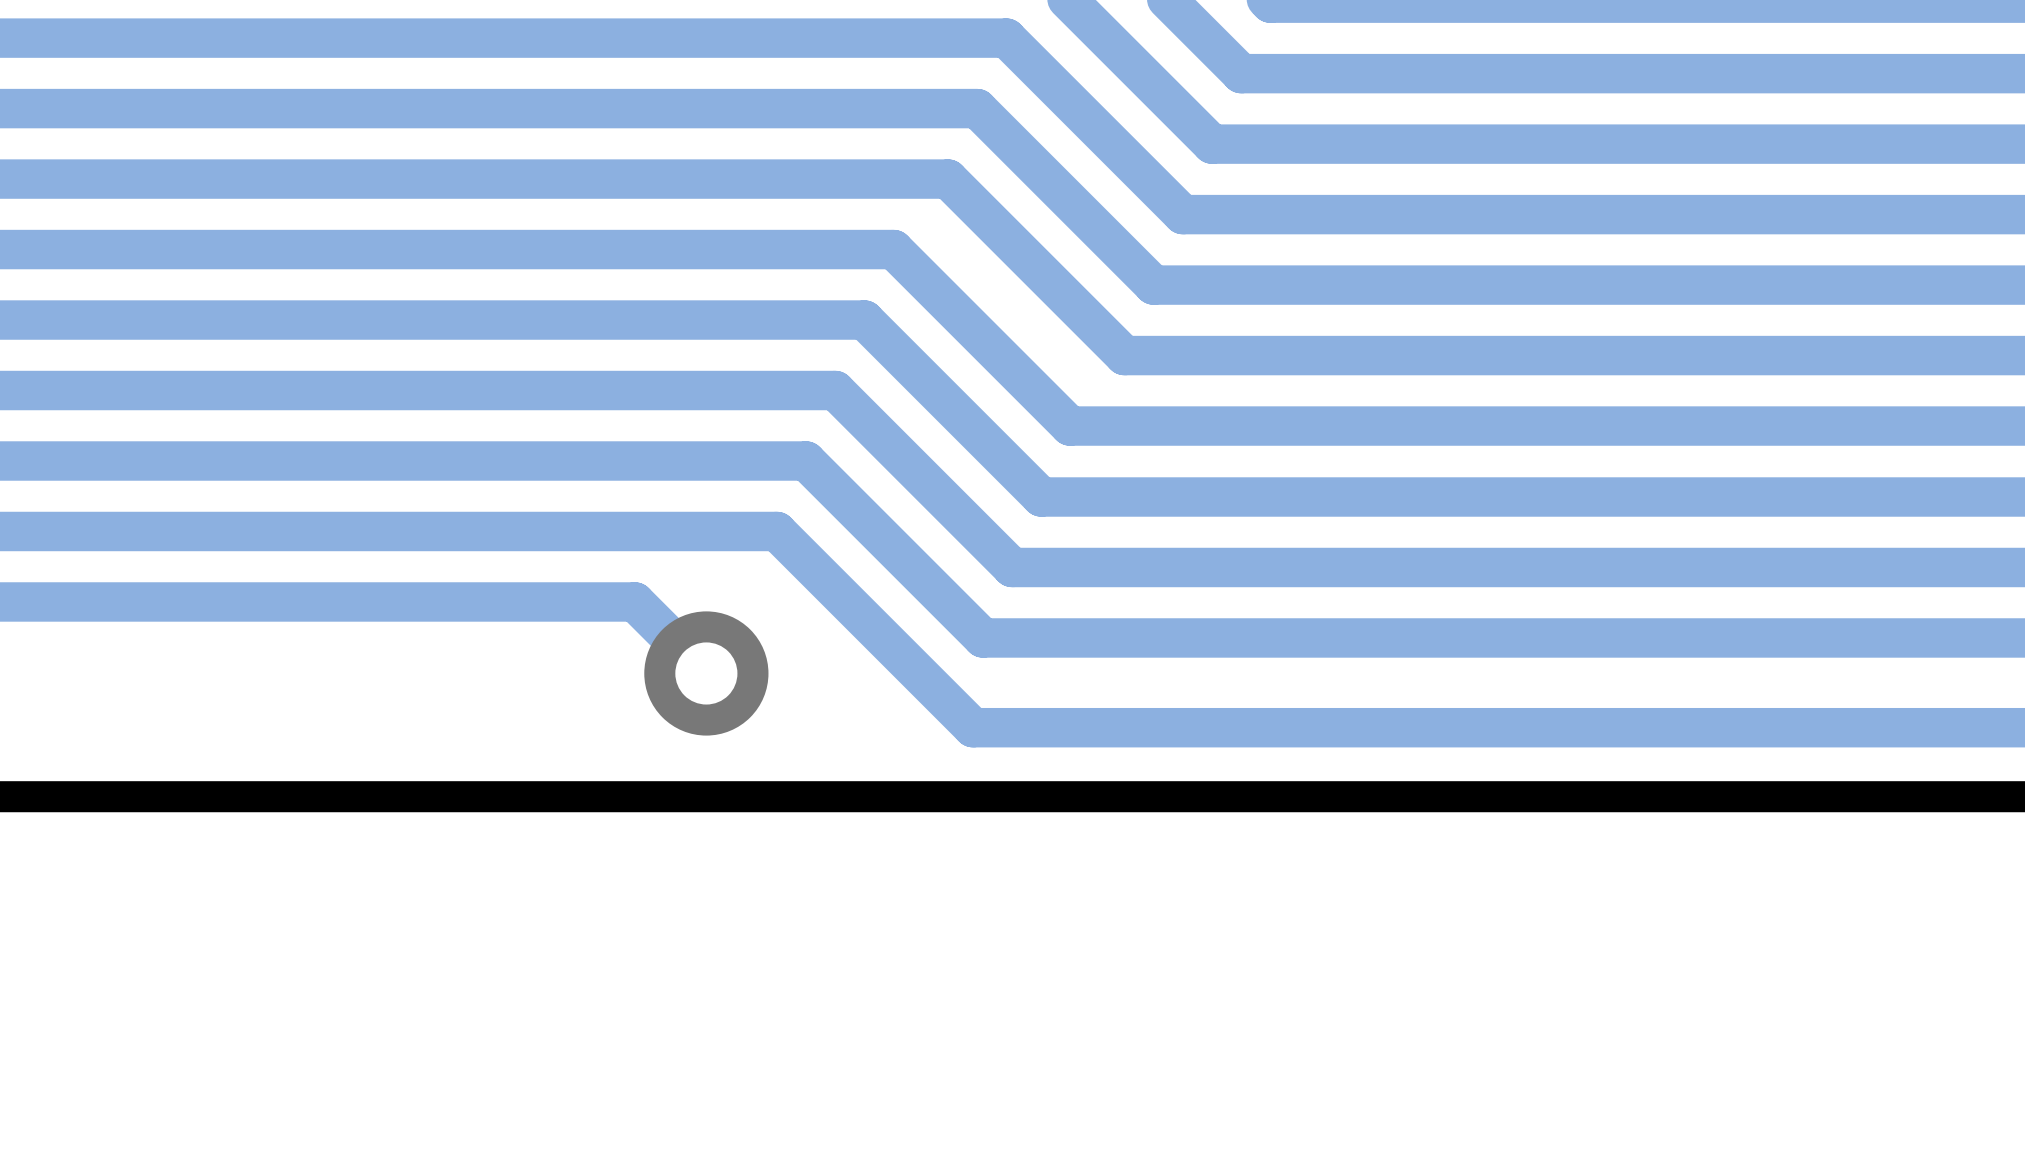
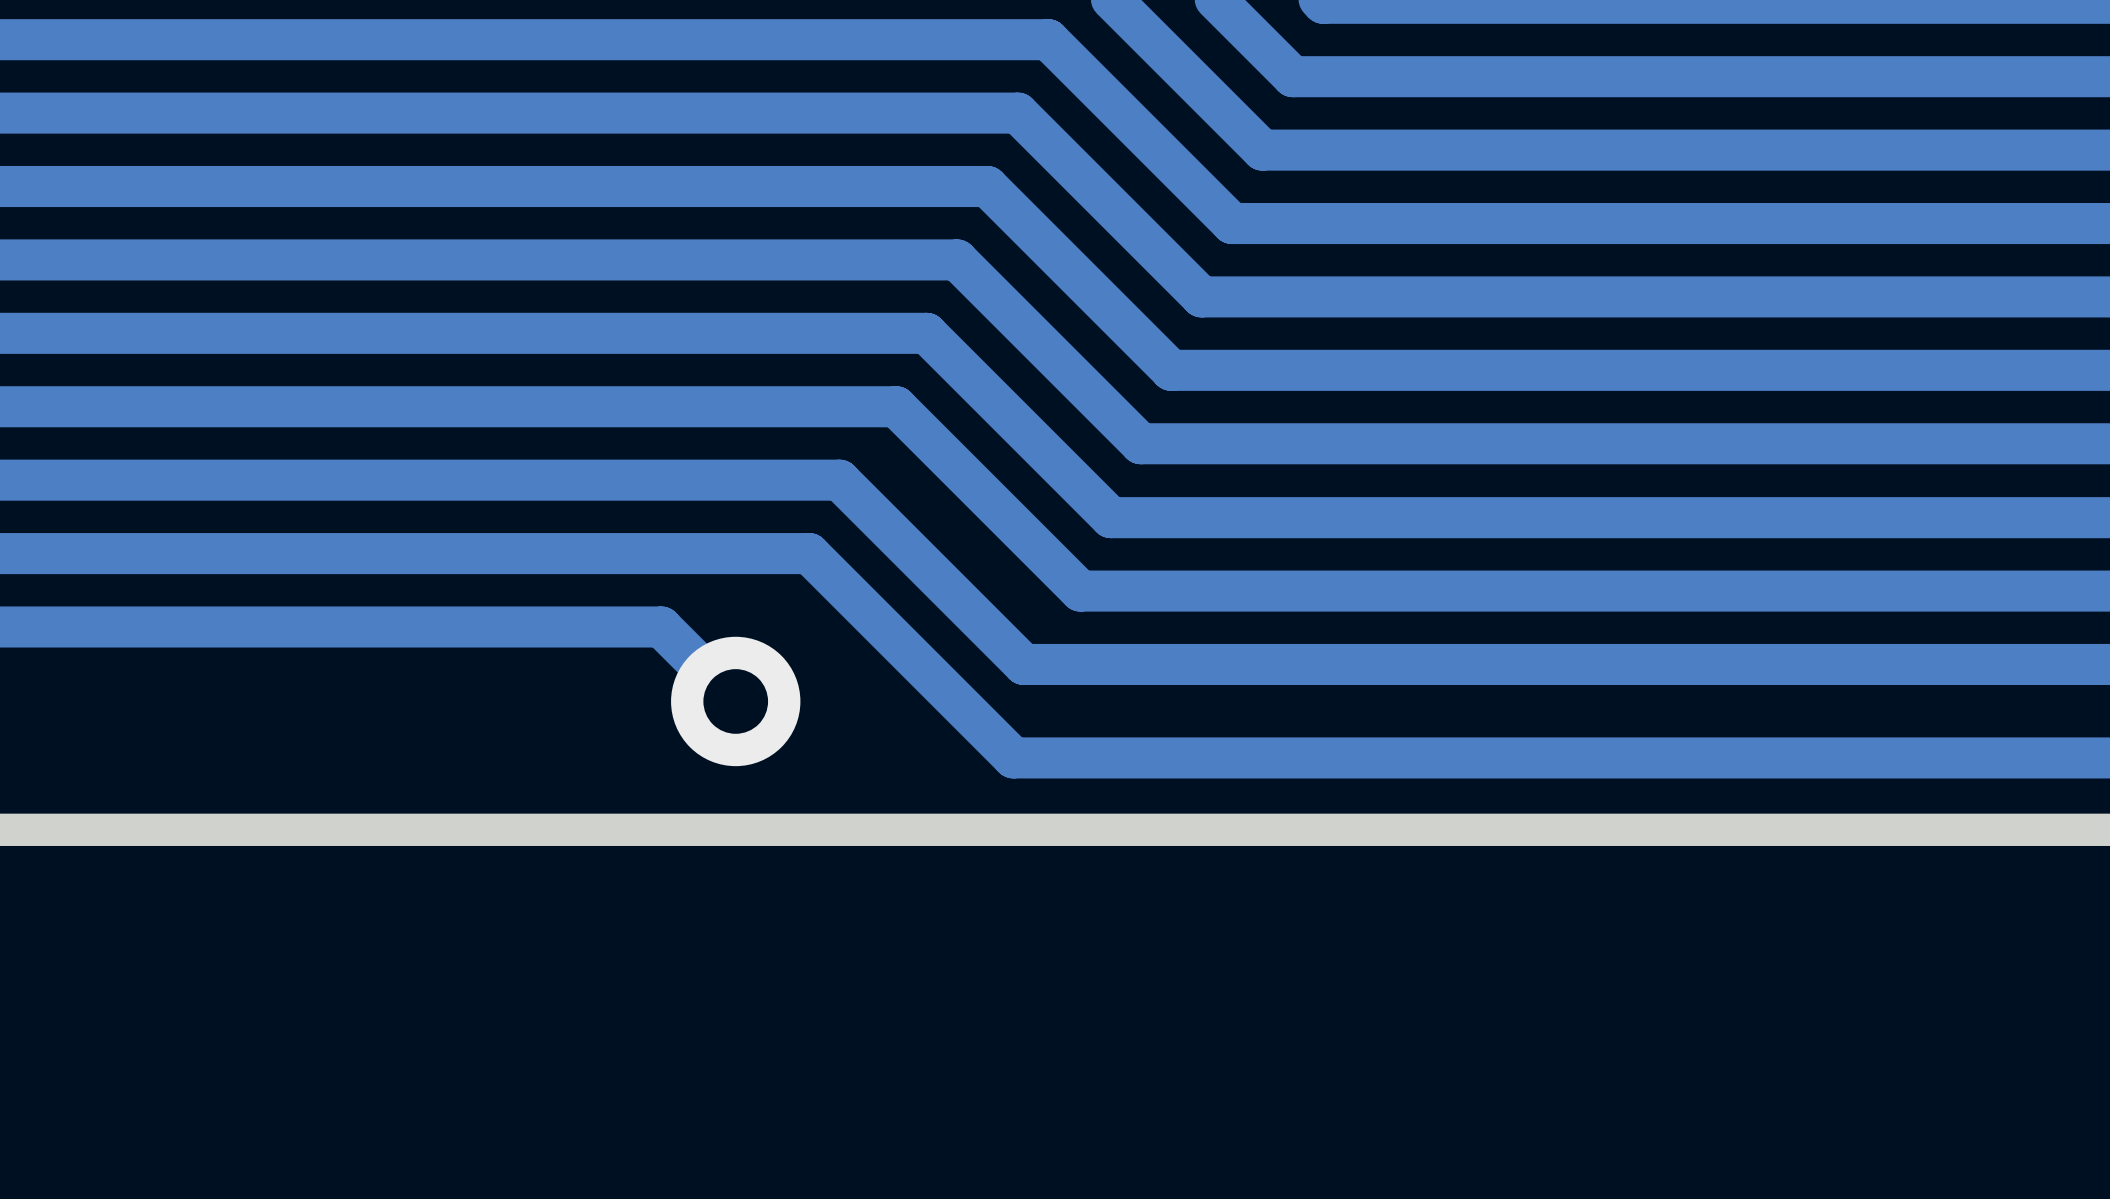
track: (893, 249) (1070, 426) (1095, 426) -> (930, 259) (957, 259) (1140, 443)
track: (864, 320) (1041, 497) (1066, 497) -> (900, 333) (926, 333) (1110, 517)
track: (835, 390) (1012, 567) (1037, 567) -> (869, 406) (896, 406) (1080, 591)

